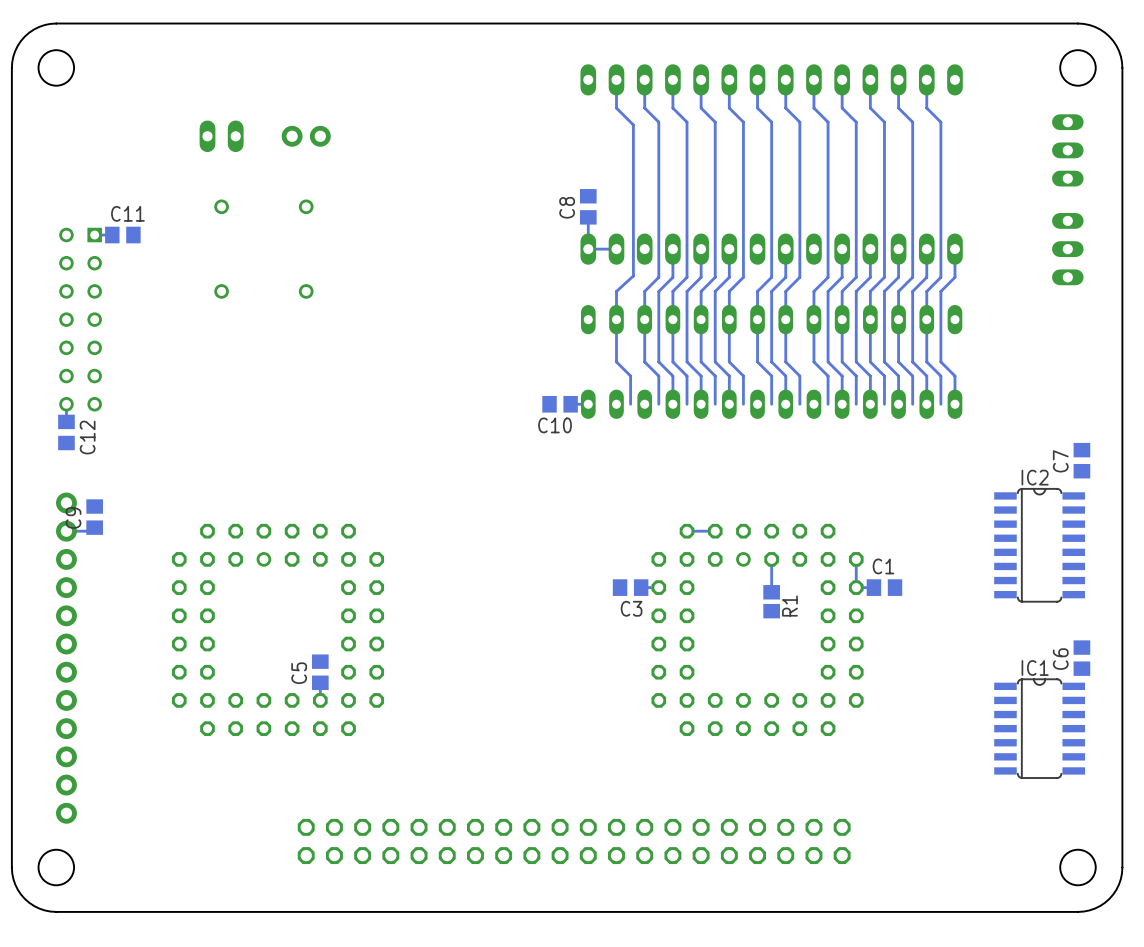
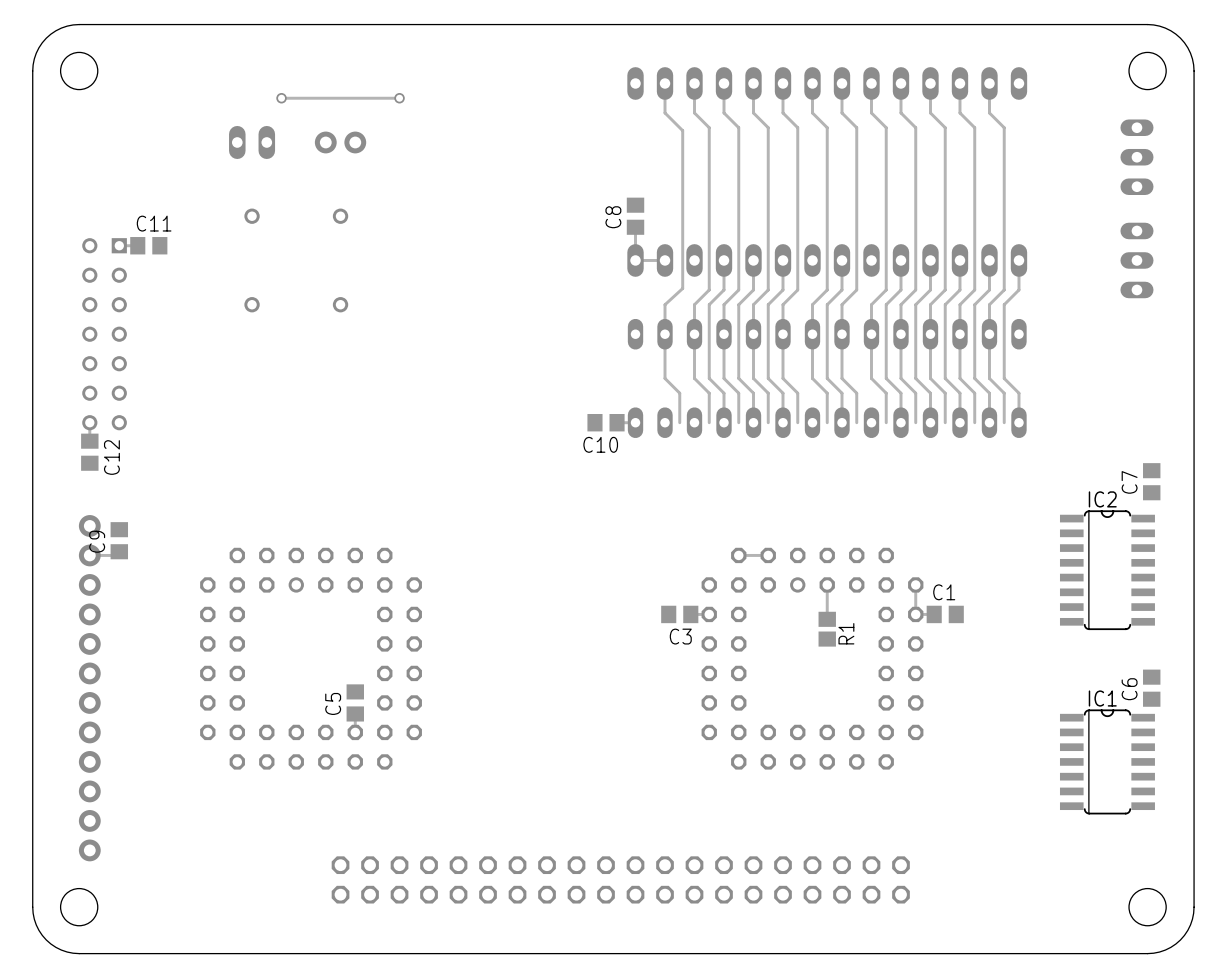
via: none -> (281, 98)
track: none -> (399, 98) (281, 98)
via: none -> (399, 98)

